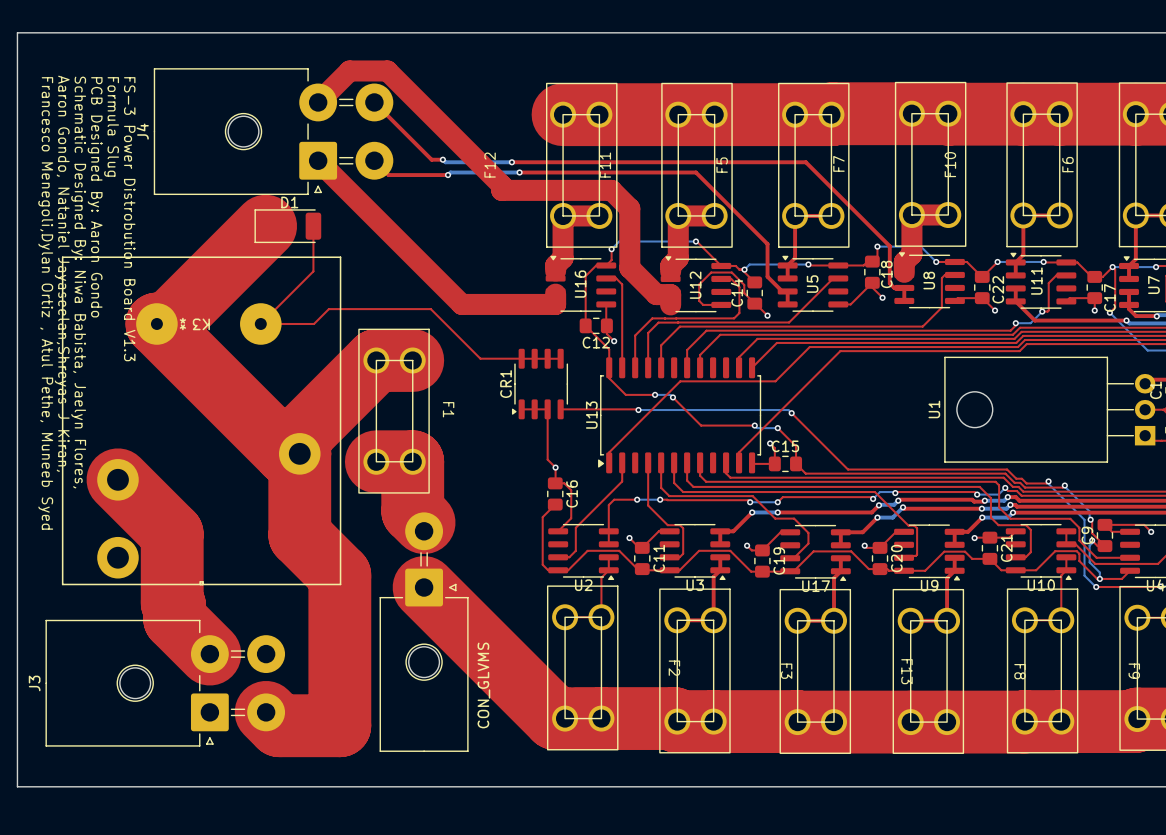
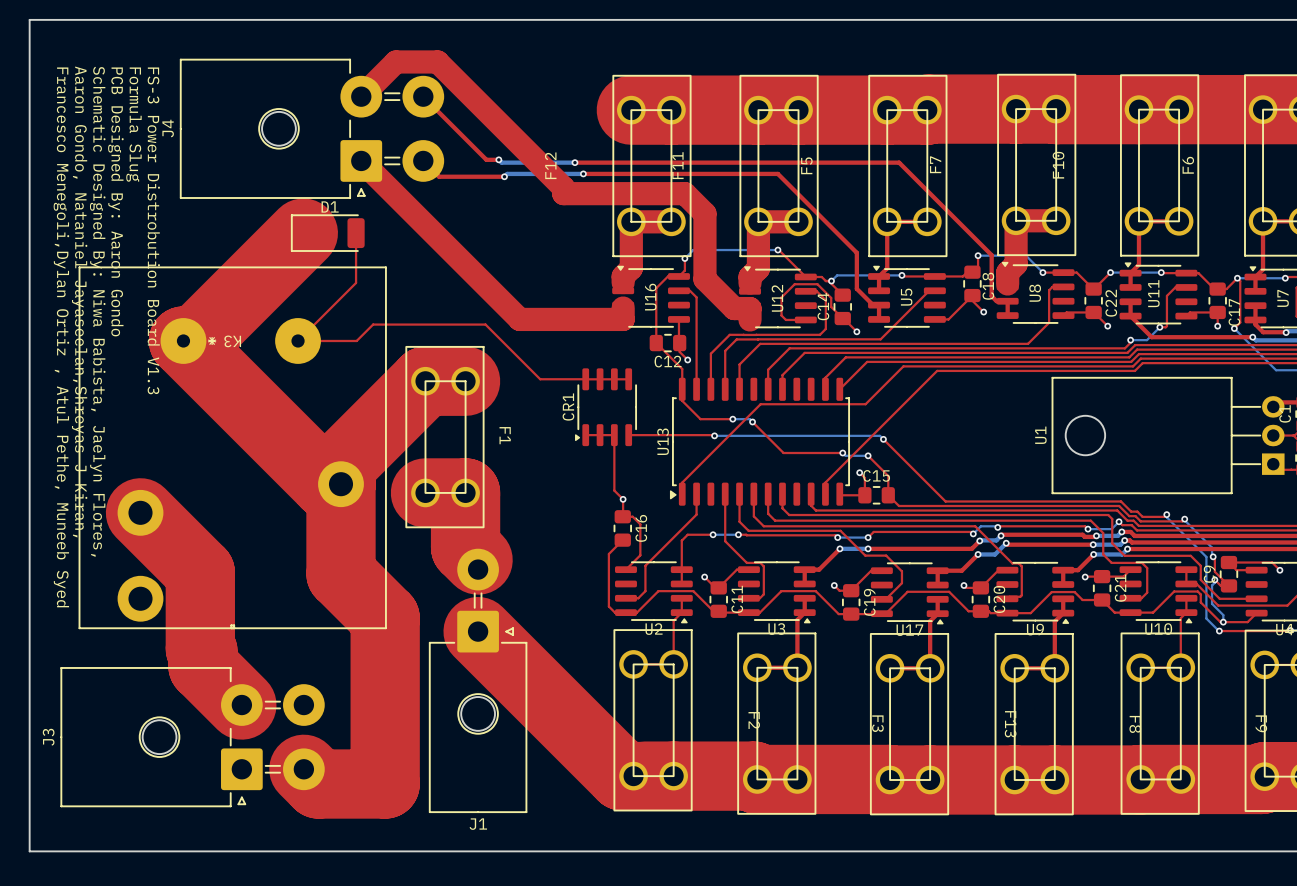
CON_GLVMS name: CON_GLVMS (483, 685) -> J1 (478, 824)

